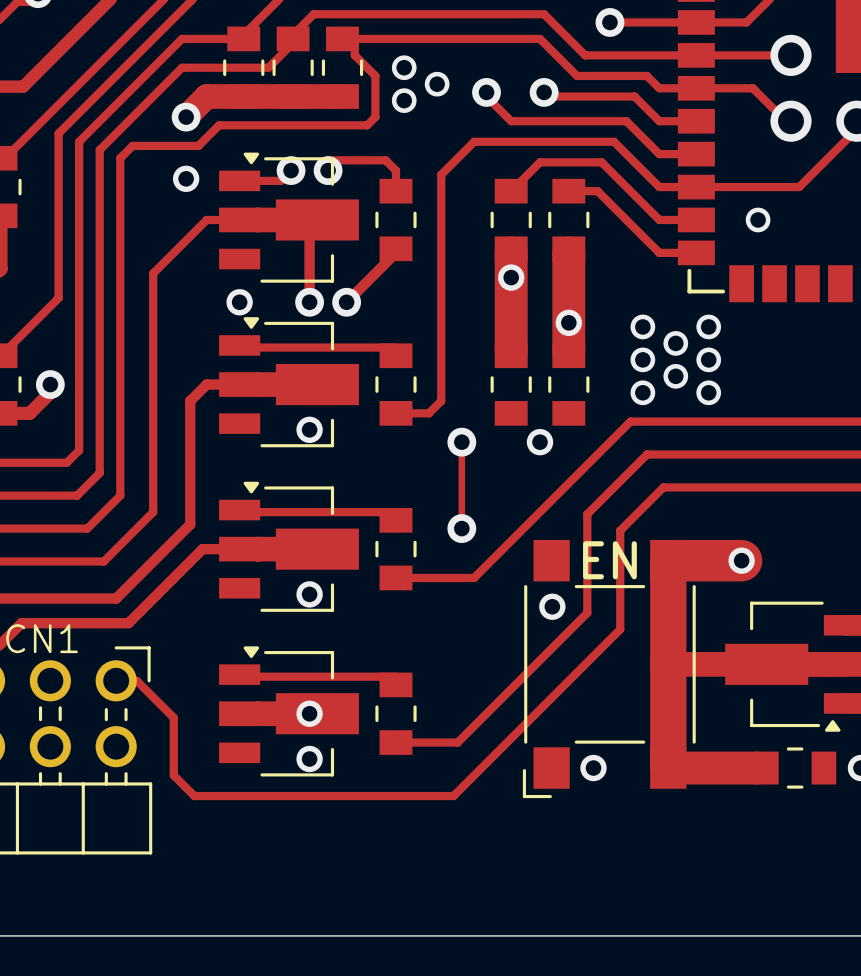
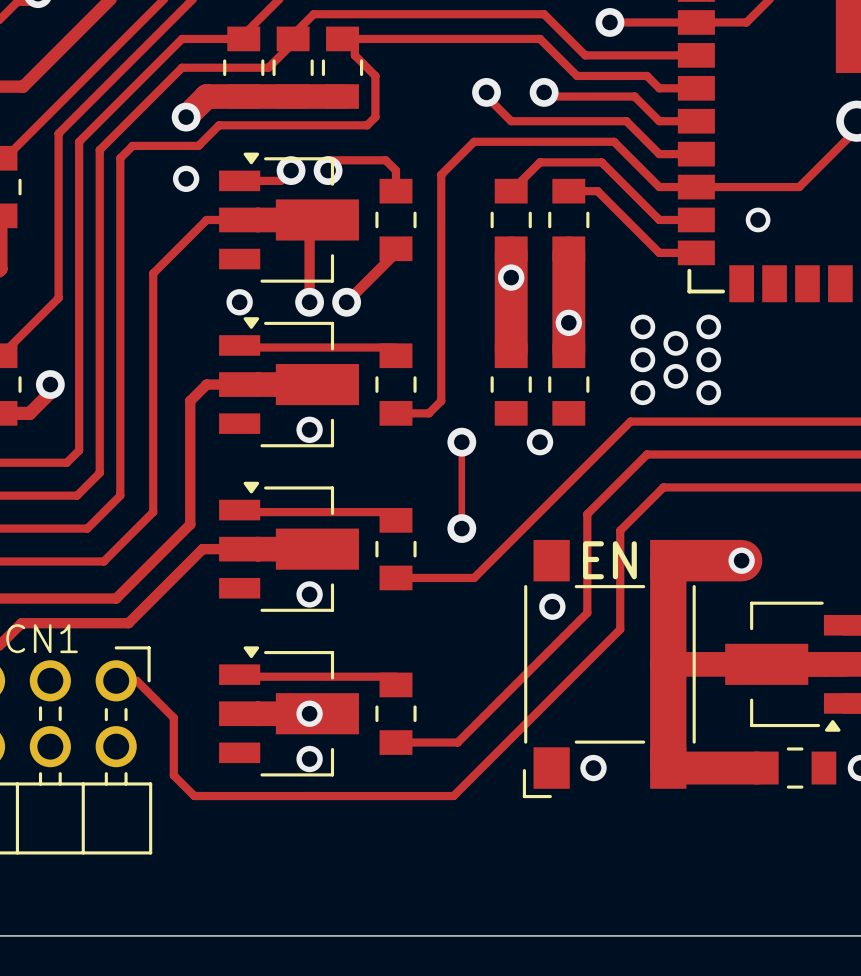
track: (696, 55) (791, 55) -> none
via: (791, 55) -> none
via: (404, 67) -> none
via: (437, 84) -> none
track: (696, 88) (752, 88) (785, 121) (791, 121) -> none
via: (404, 100) -> none
via: (791, 121) -> none

